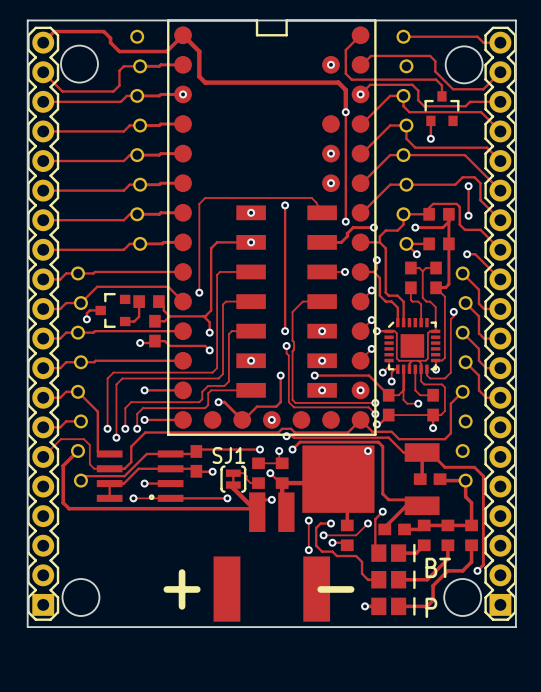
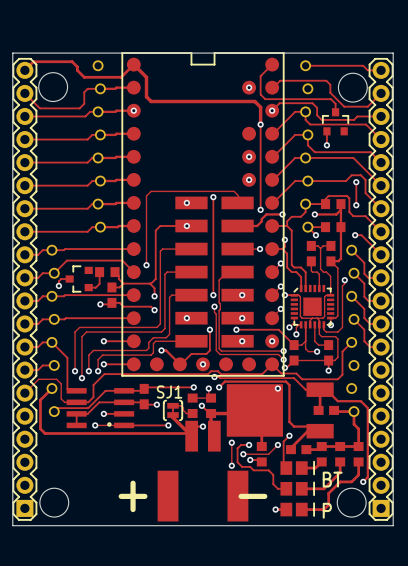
part footprint: [167, 19, 377, 436] -> [121, 52, 285, 377]

